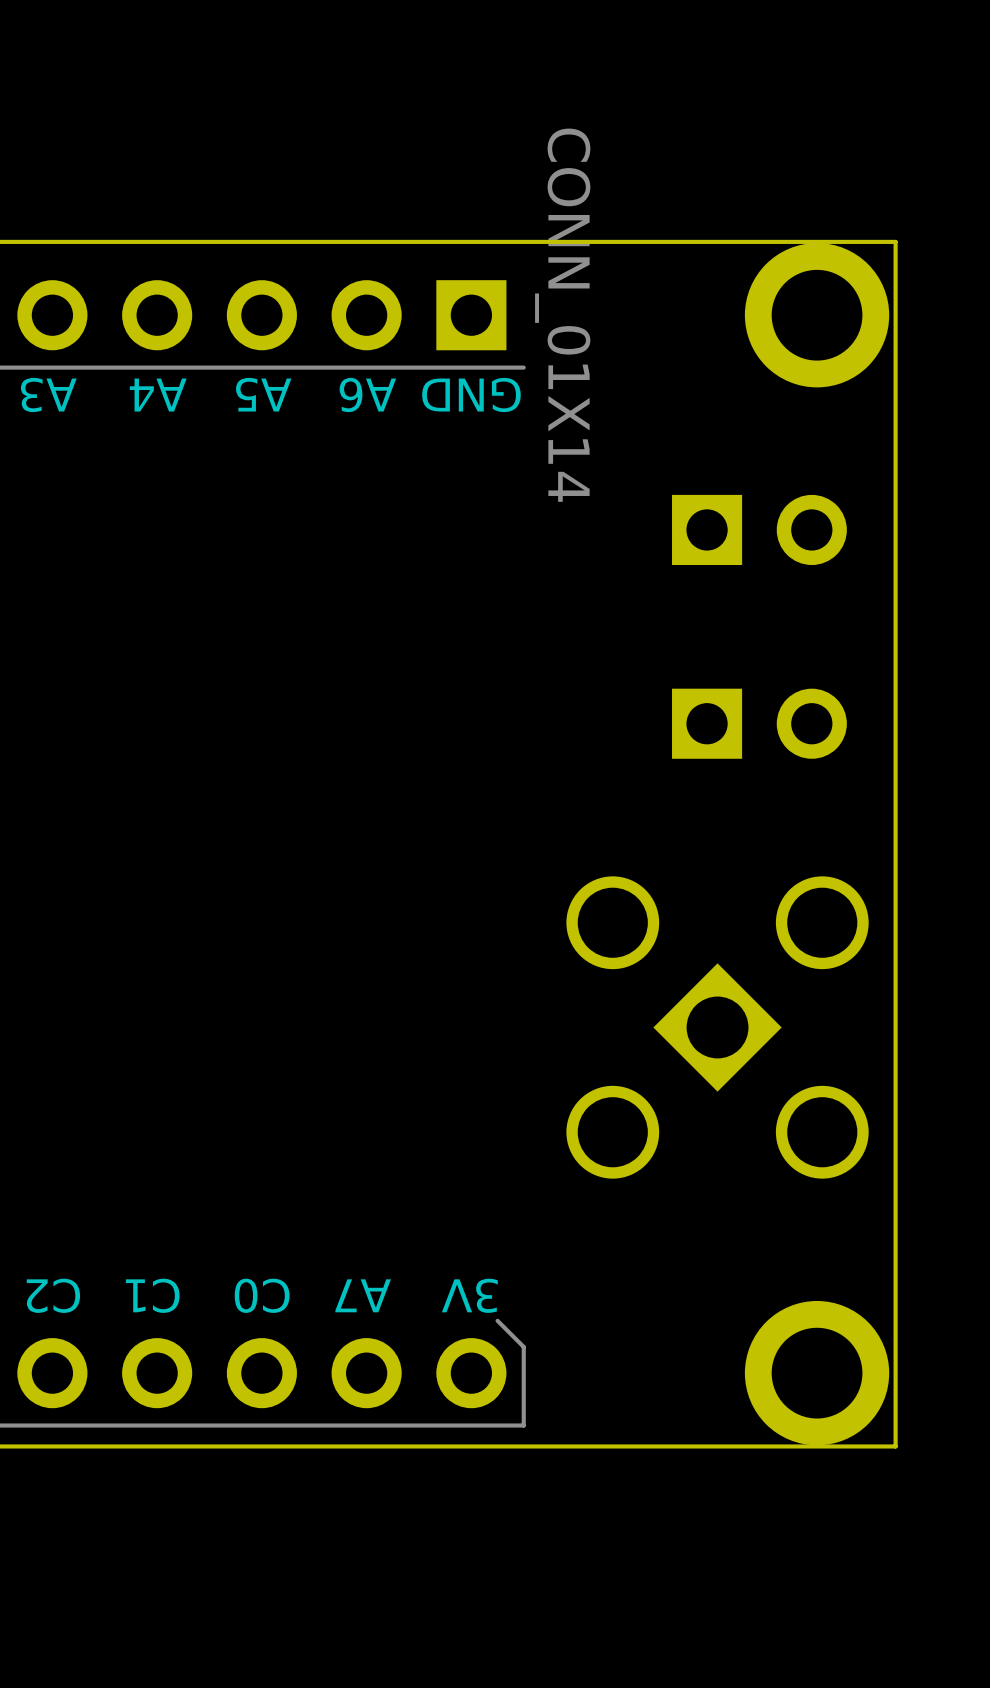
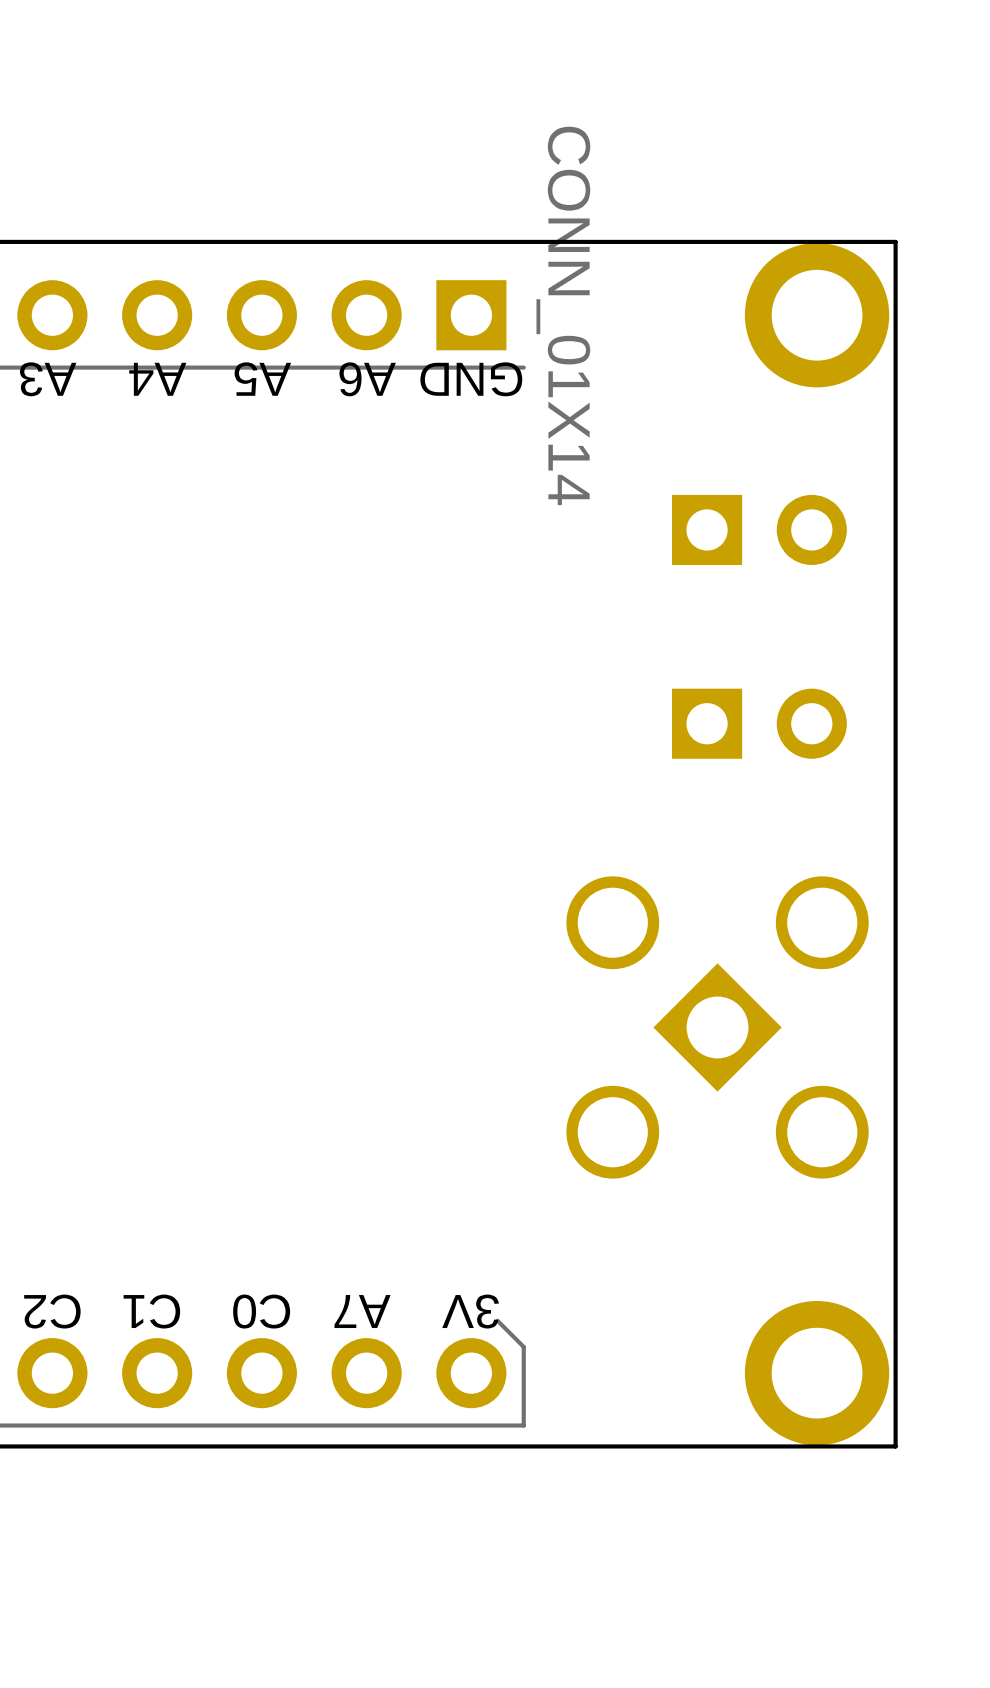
text position: A3 (48, 394) -> A3 (48, 379)
text position: A5 (263, 394) -> A5 (262, 379)
text position: A6 (367, 394) -> A6 (367, 379)
text position: GND (471, 394) -> GND (471, 379)
text position: A4 (158, 395) -> A4 (157, 379)
text position: C2 (53, 1295) -> C2 (52, 1311)
text position: C1 (152, 1295) -> C1 (151, 1311)
text position: C0 (262, 1295) -> C0 (261, 1311)
text position: A7 (363, 1295) -> A7 (362, 1311)
text position: 3V (469, 1295) -> 3V (470, 1311)

